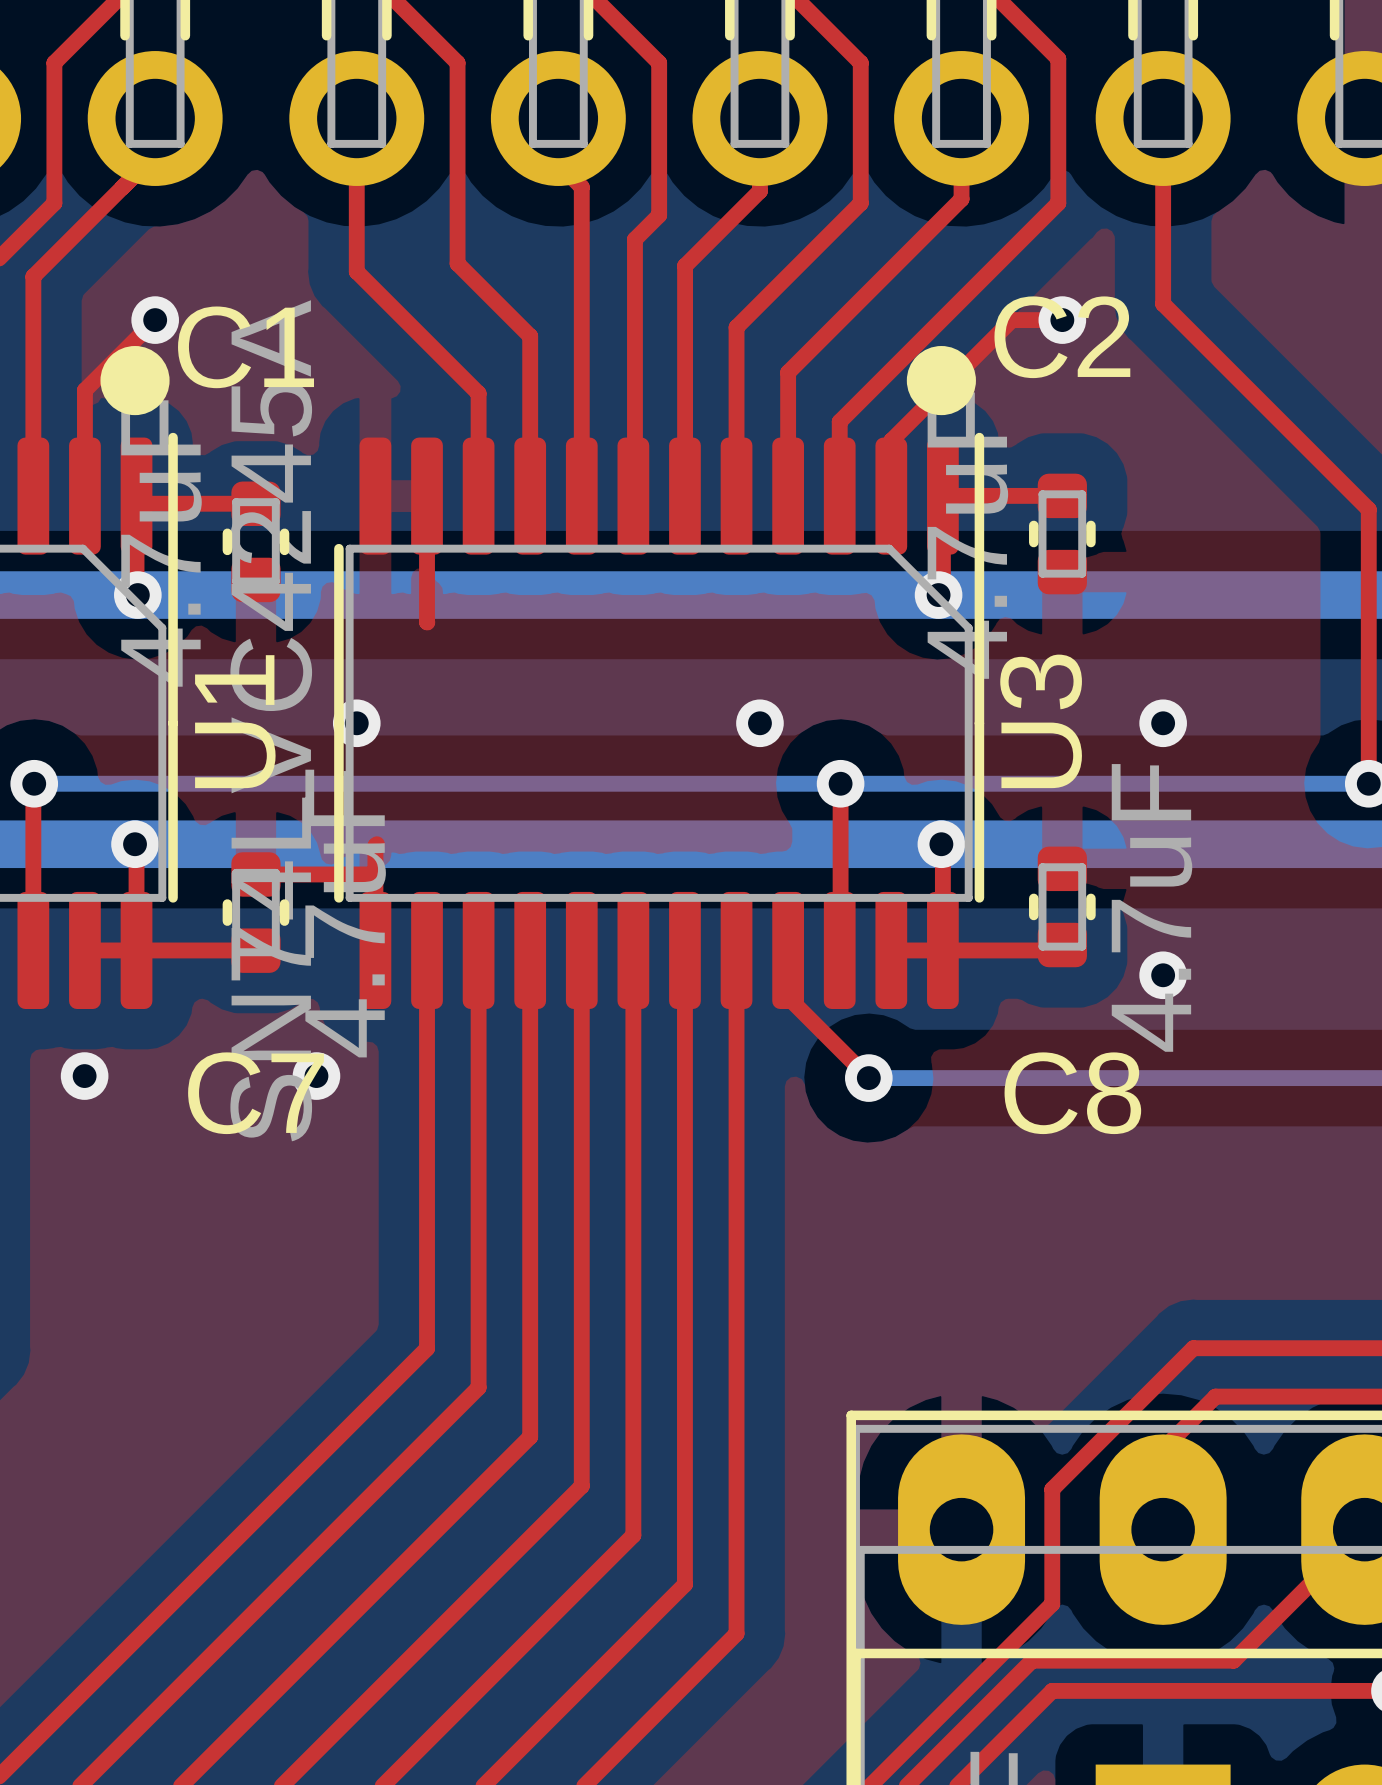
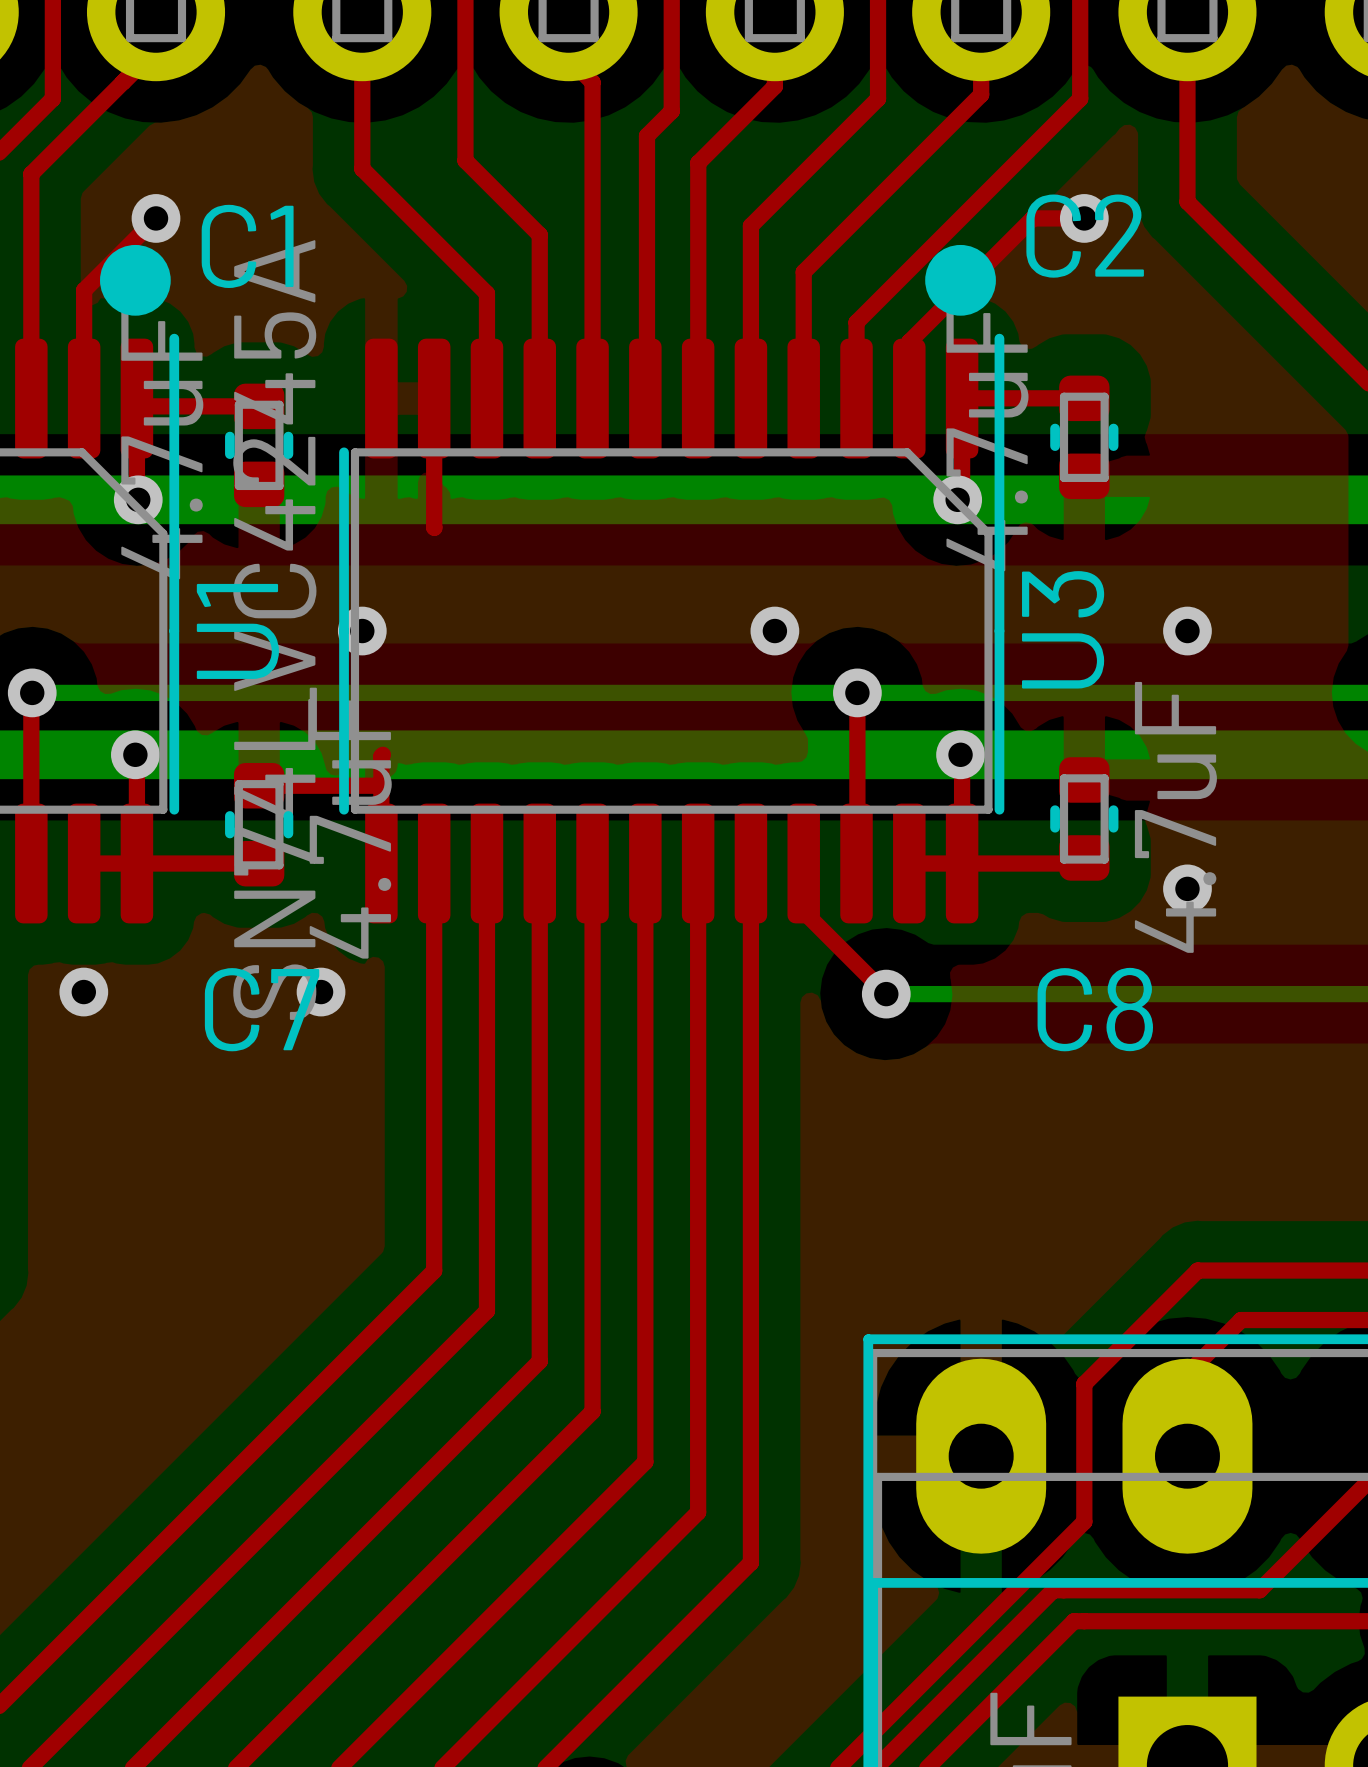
top track: (1193, 1348) (1052, 1489) (1052, 1603) -> (1218, 1270) (1197, 1270) (1084, 1383) (1084, 1521) (1074, 1532)

